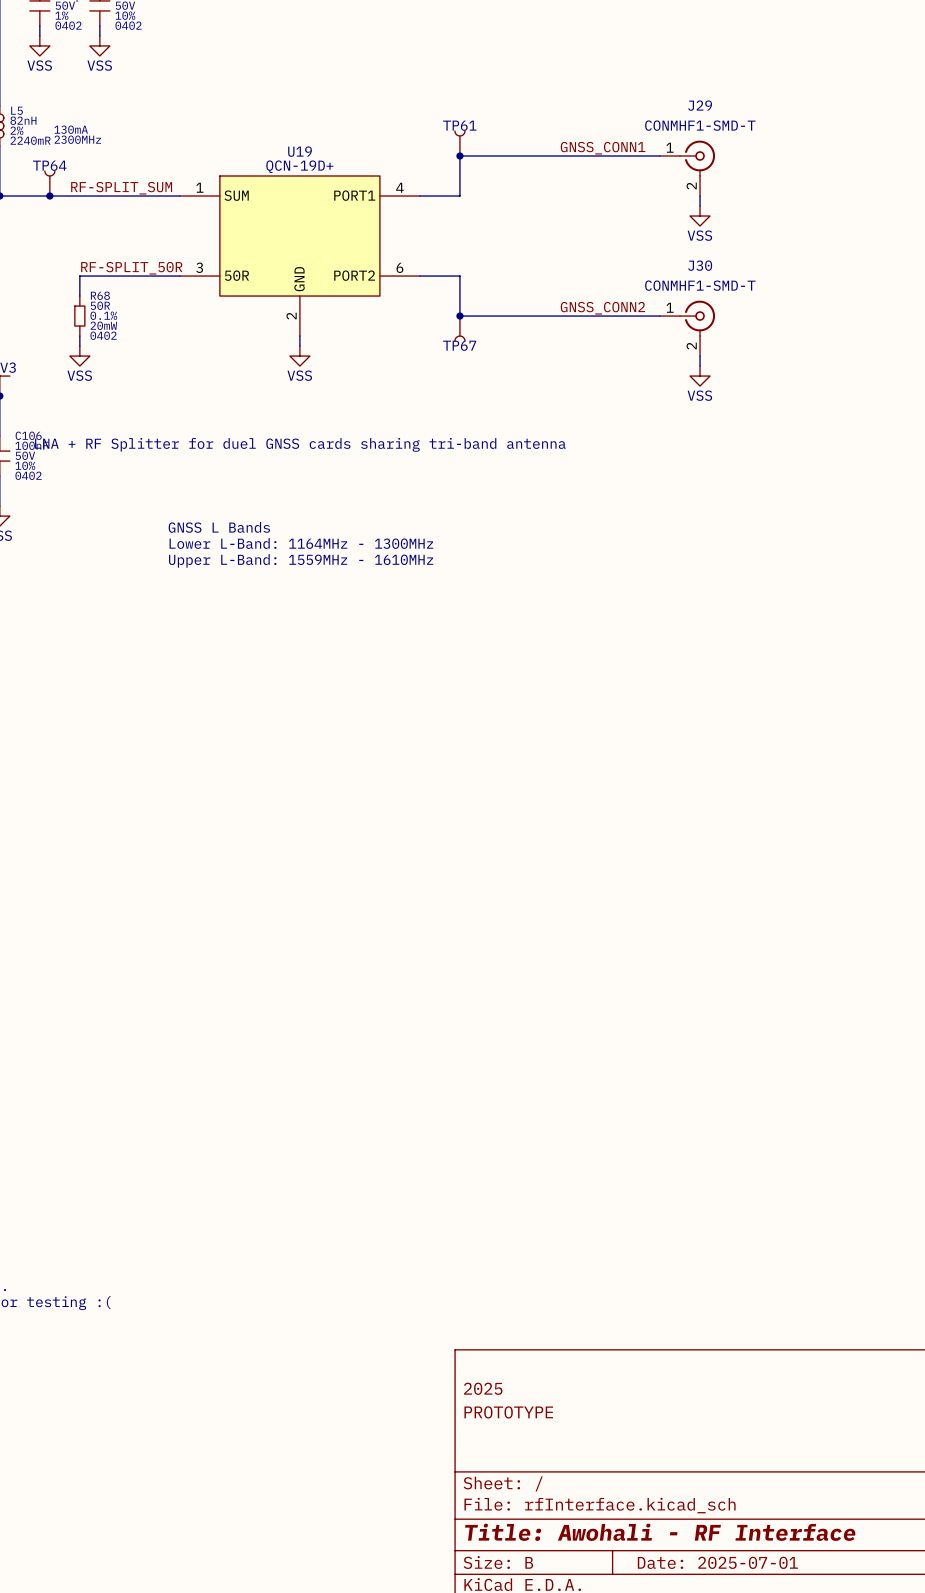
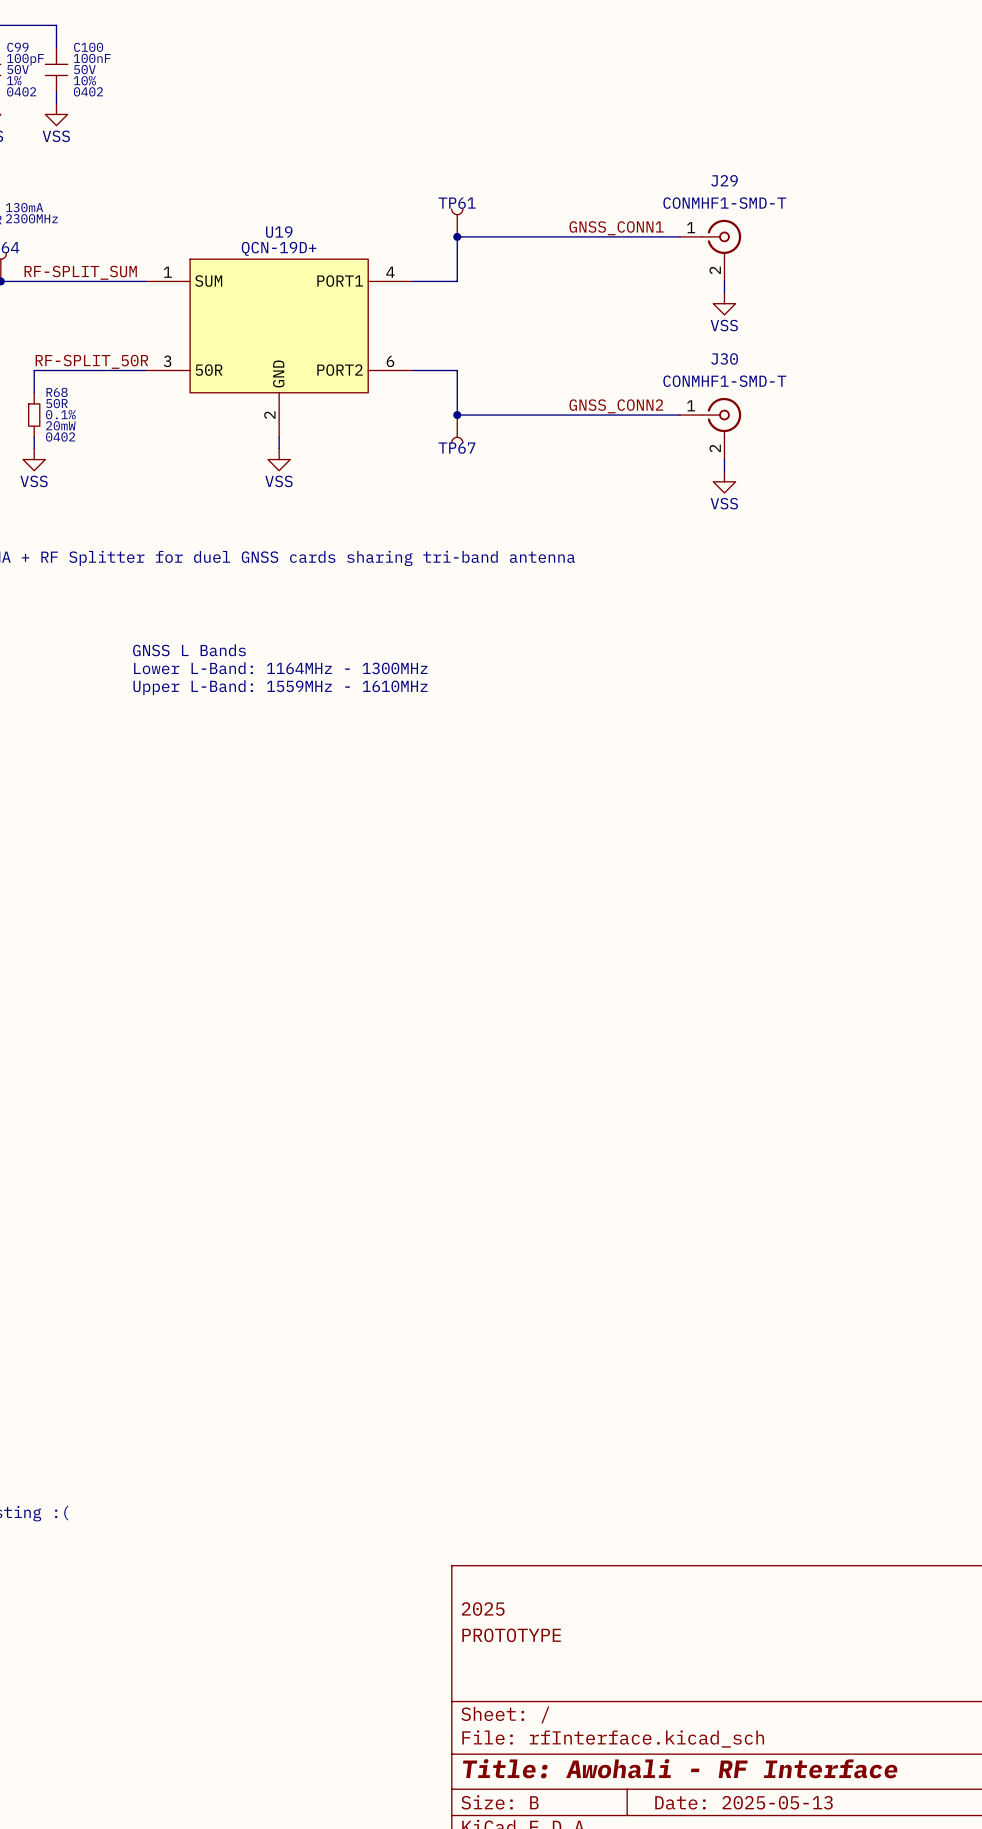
title block: Date: 2025-07-01 (717, 1562) -> Date: 2025-05-13 (744, 1802)

